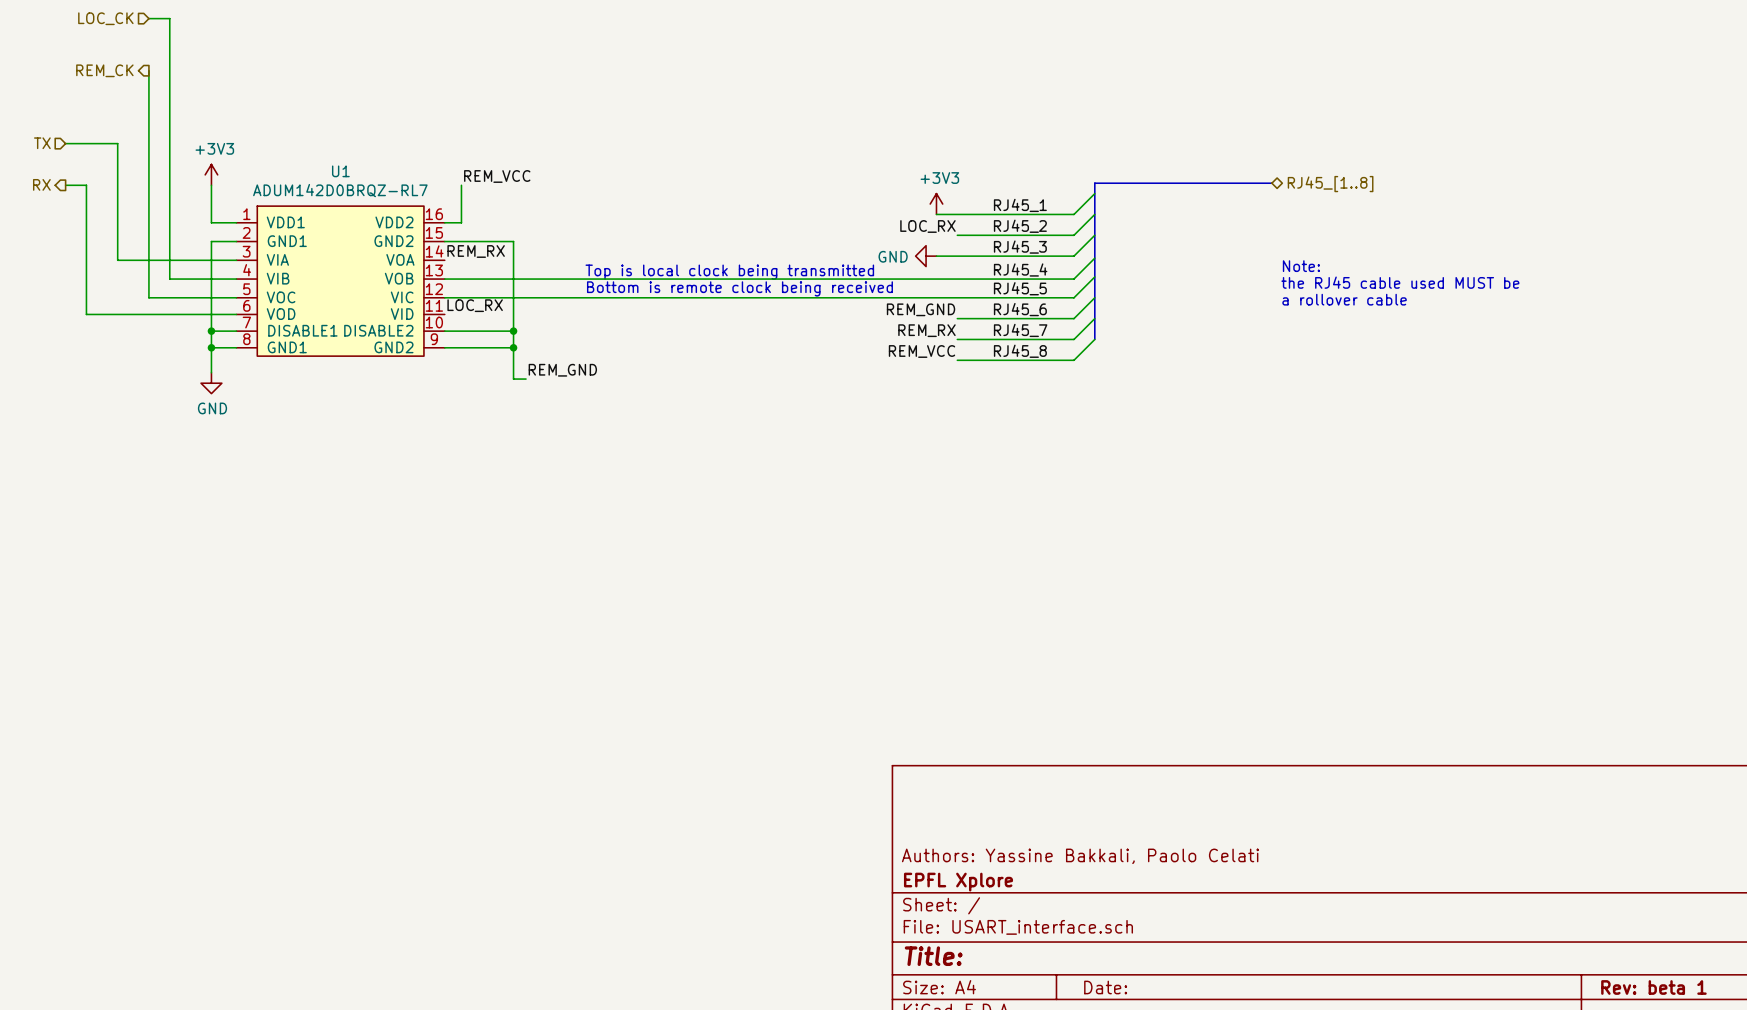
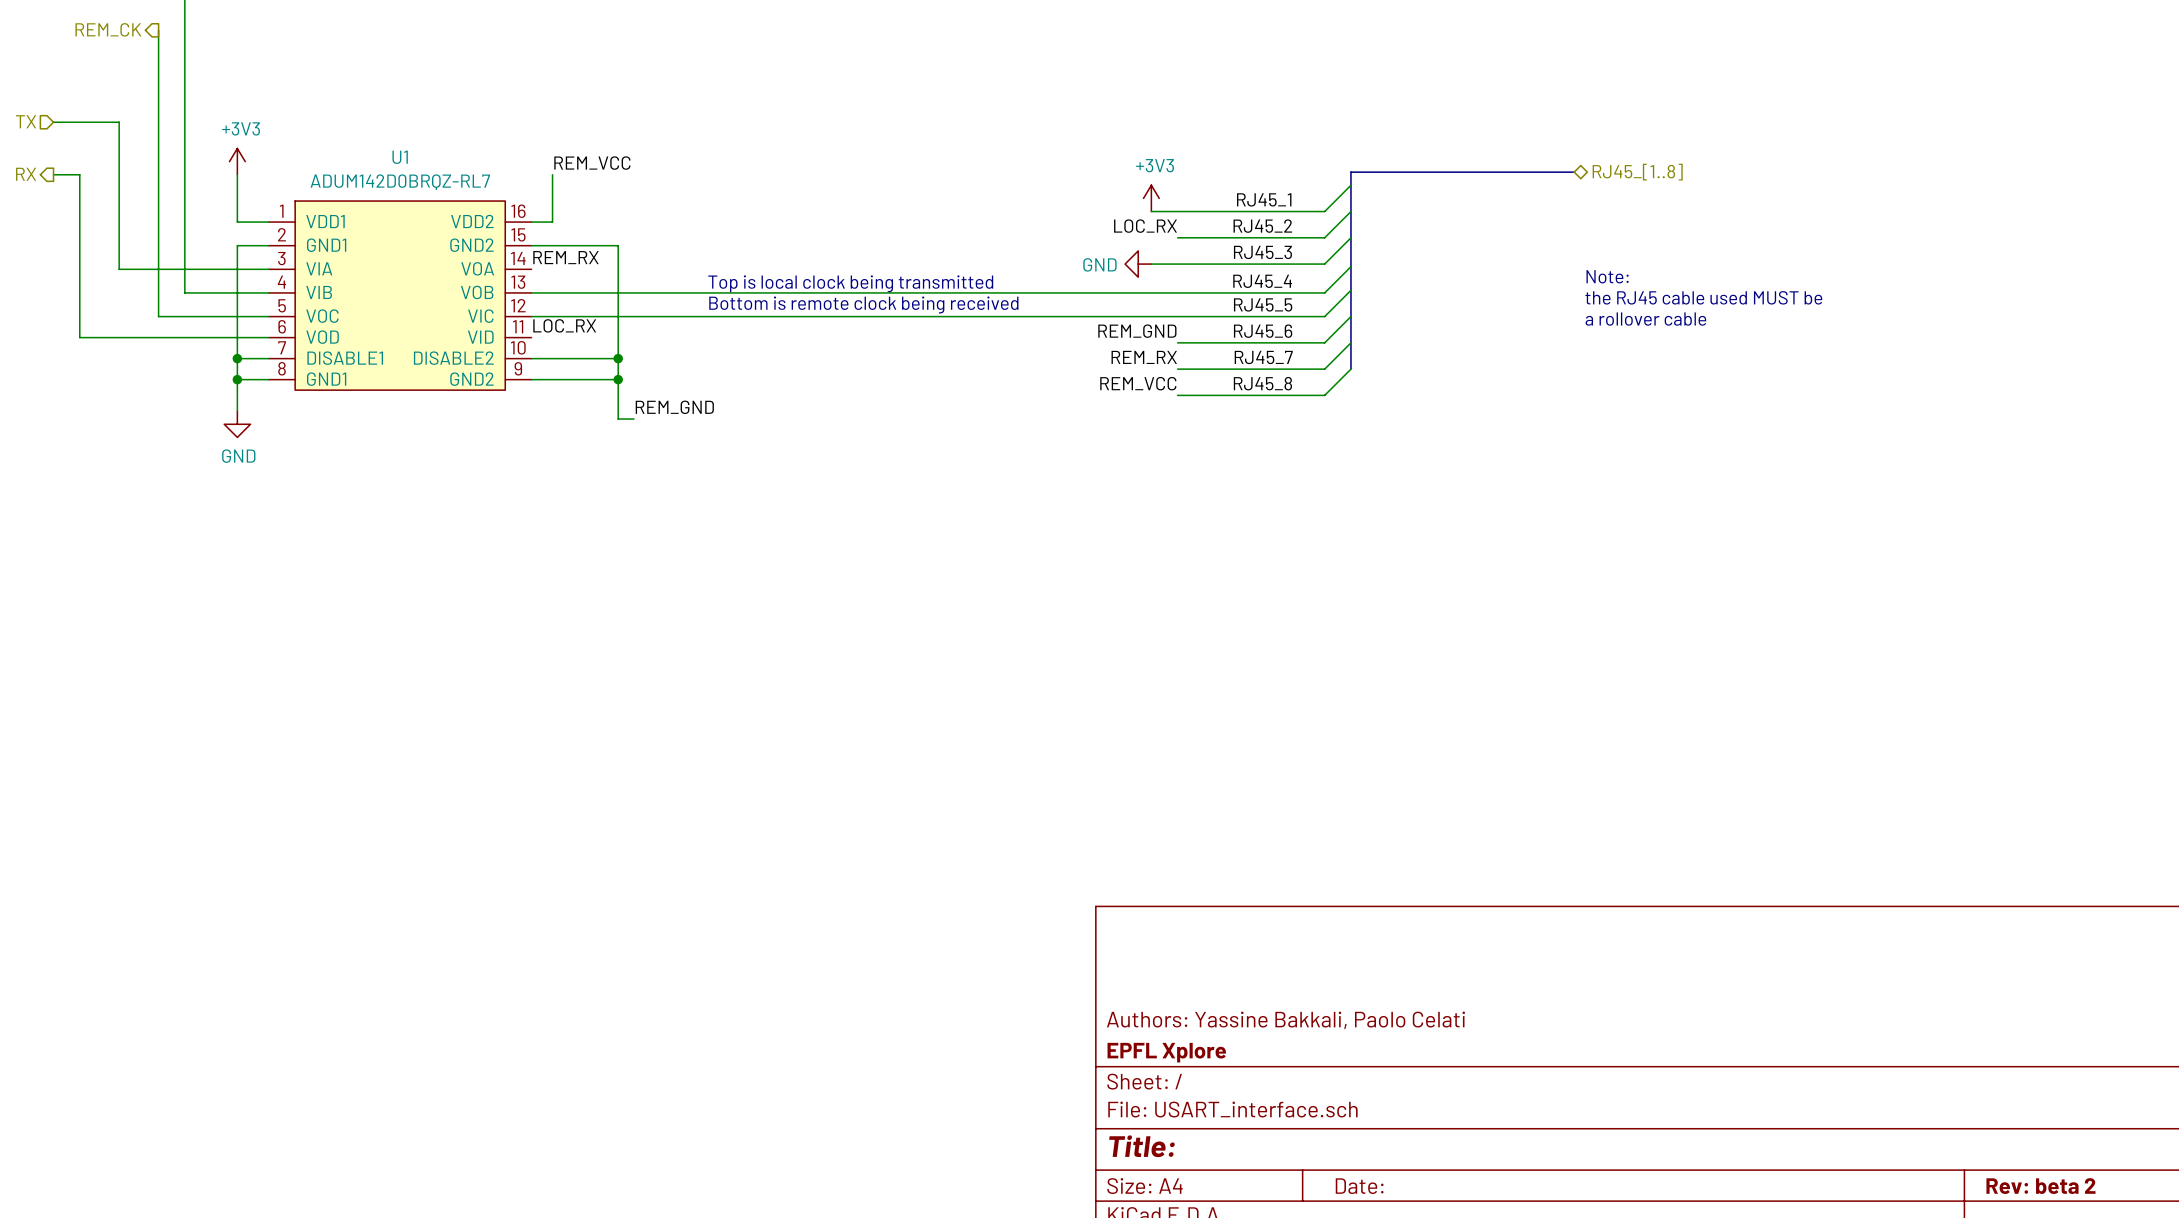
title block: Rev: beta 1 (1653, 987) -> Rev: beta 2 (2040, 1186)

